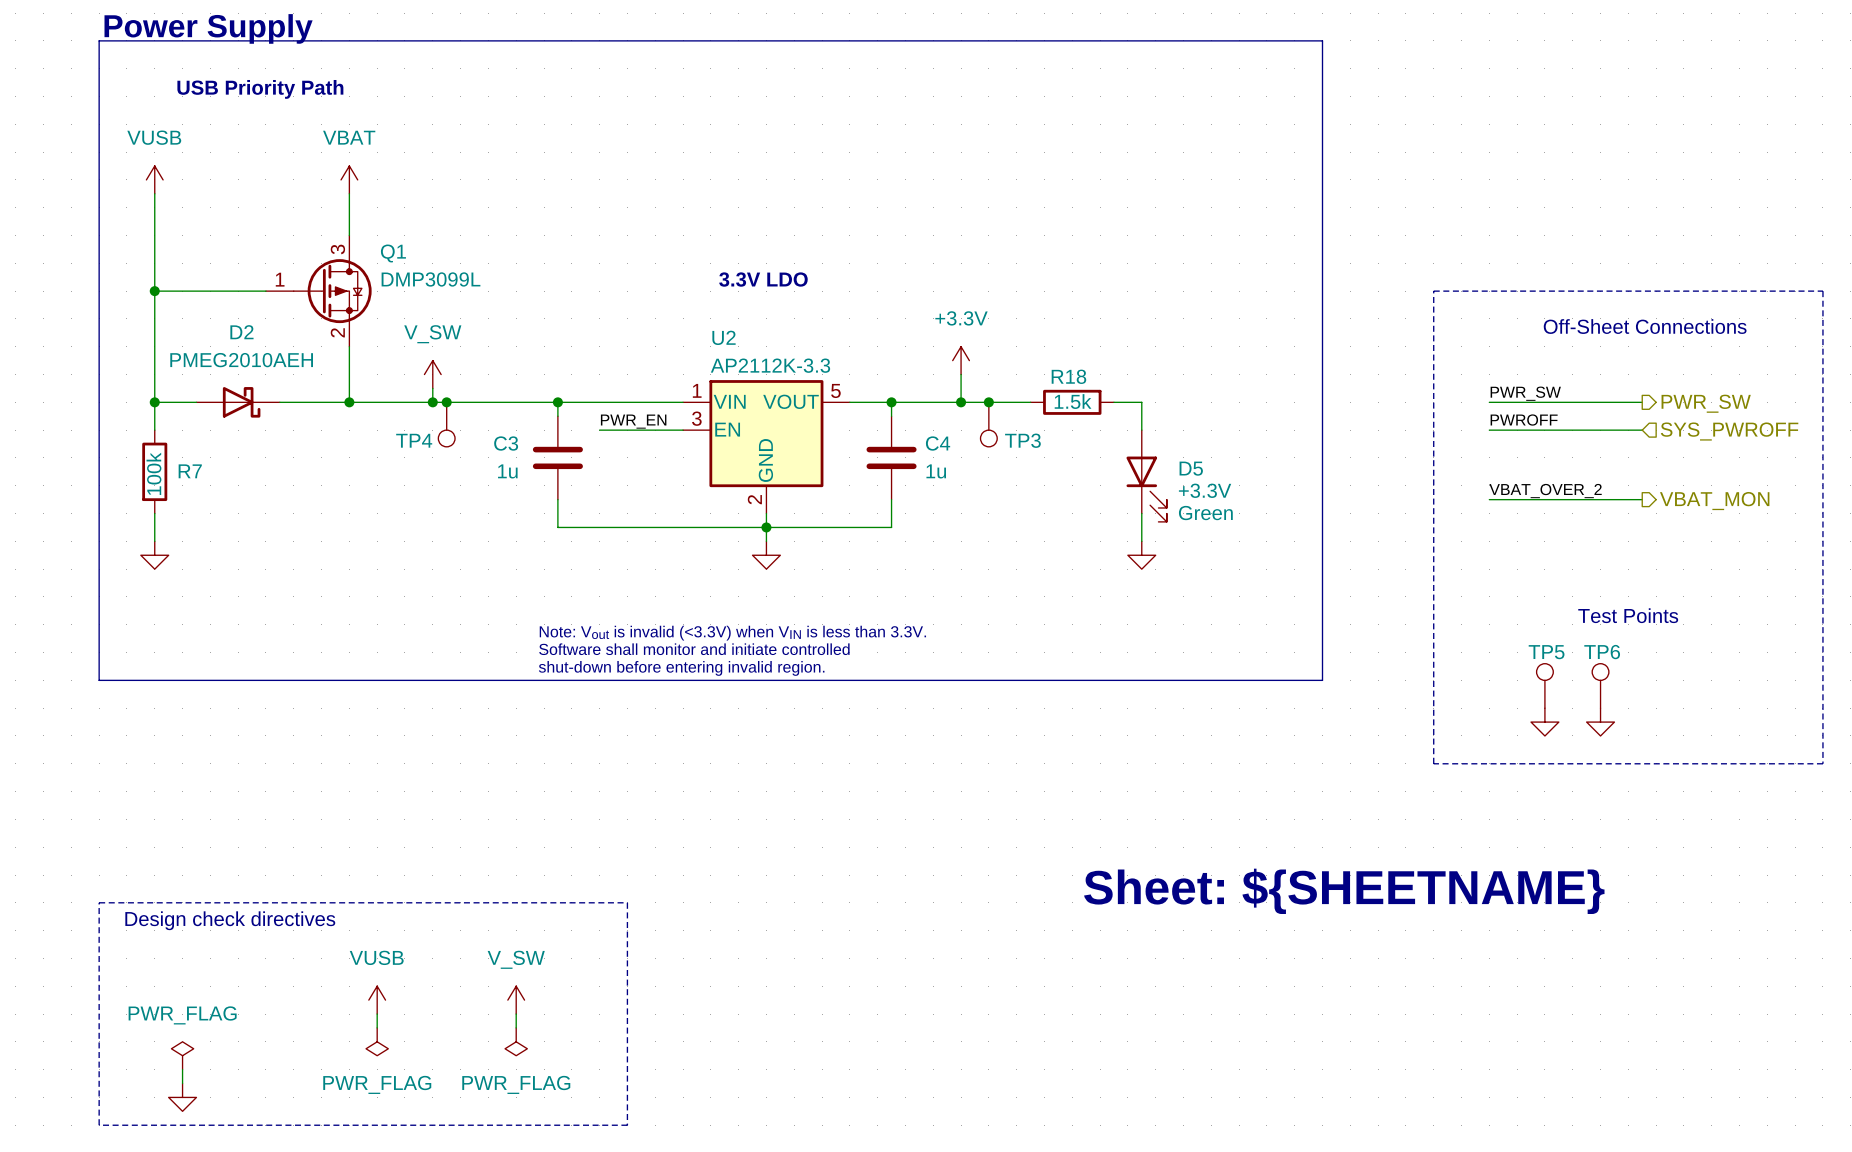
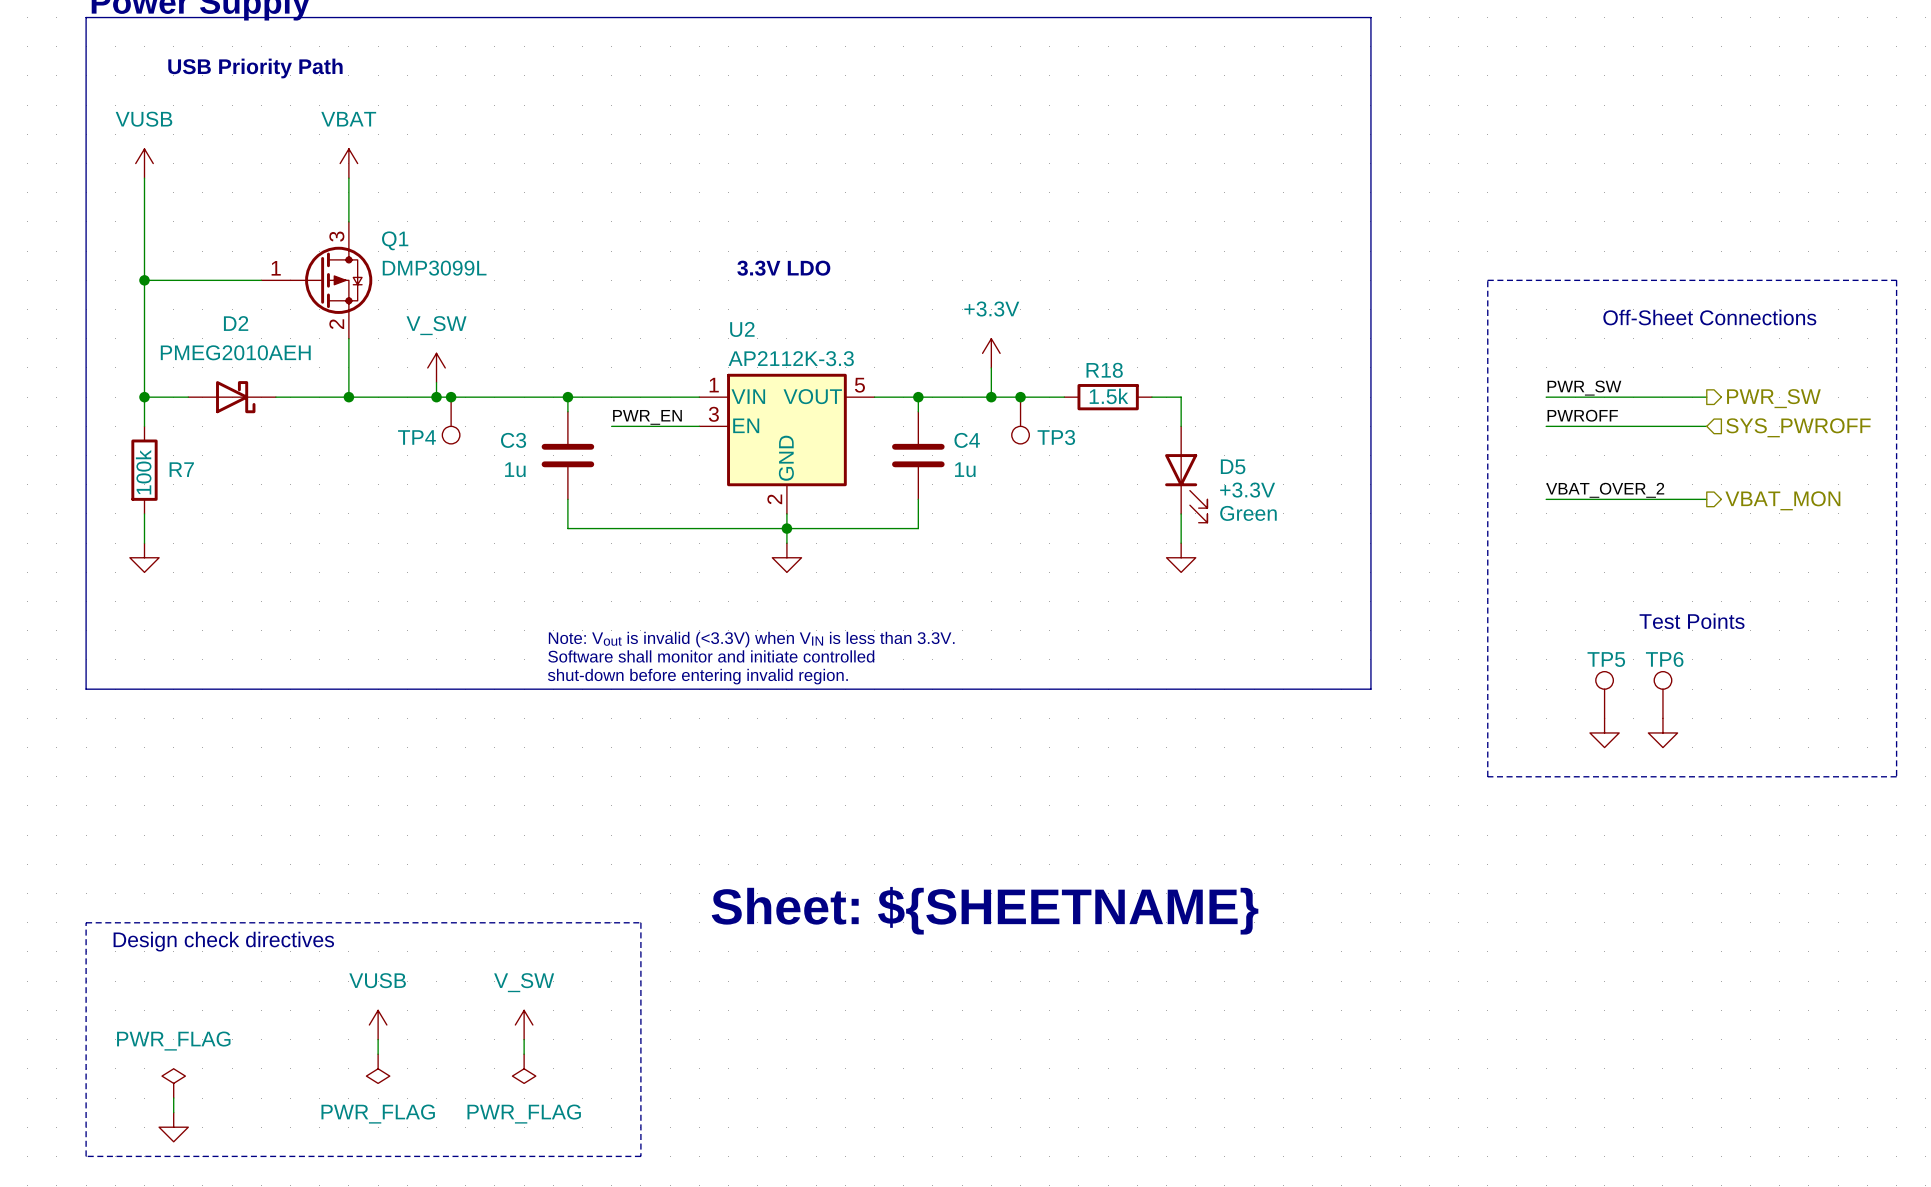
text: none -> Sheet: ${SHEETNAME} (985, 910)
text: Sheet: ${SHEETNAME} (1344, 891) -> none

